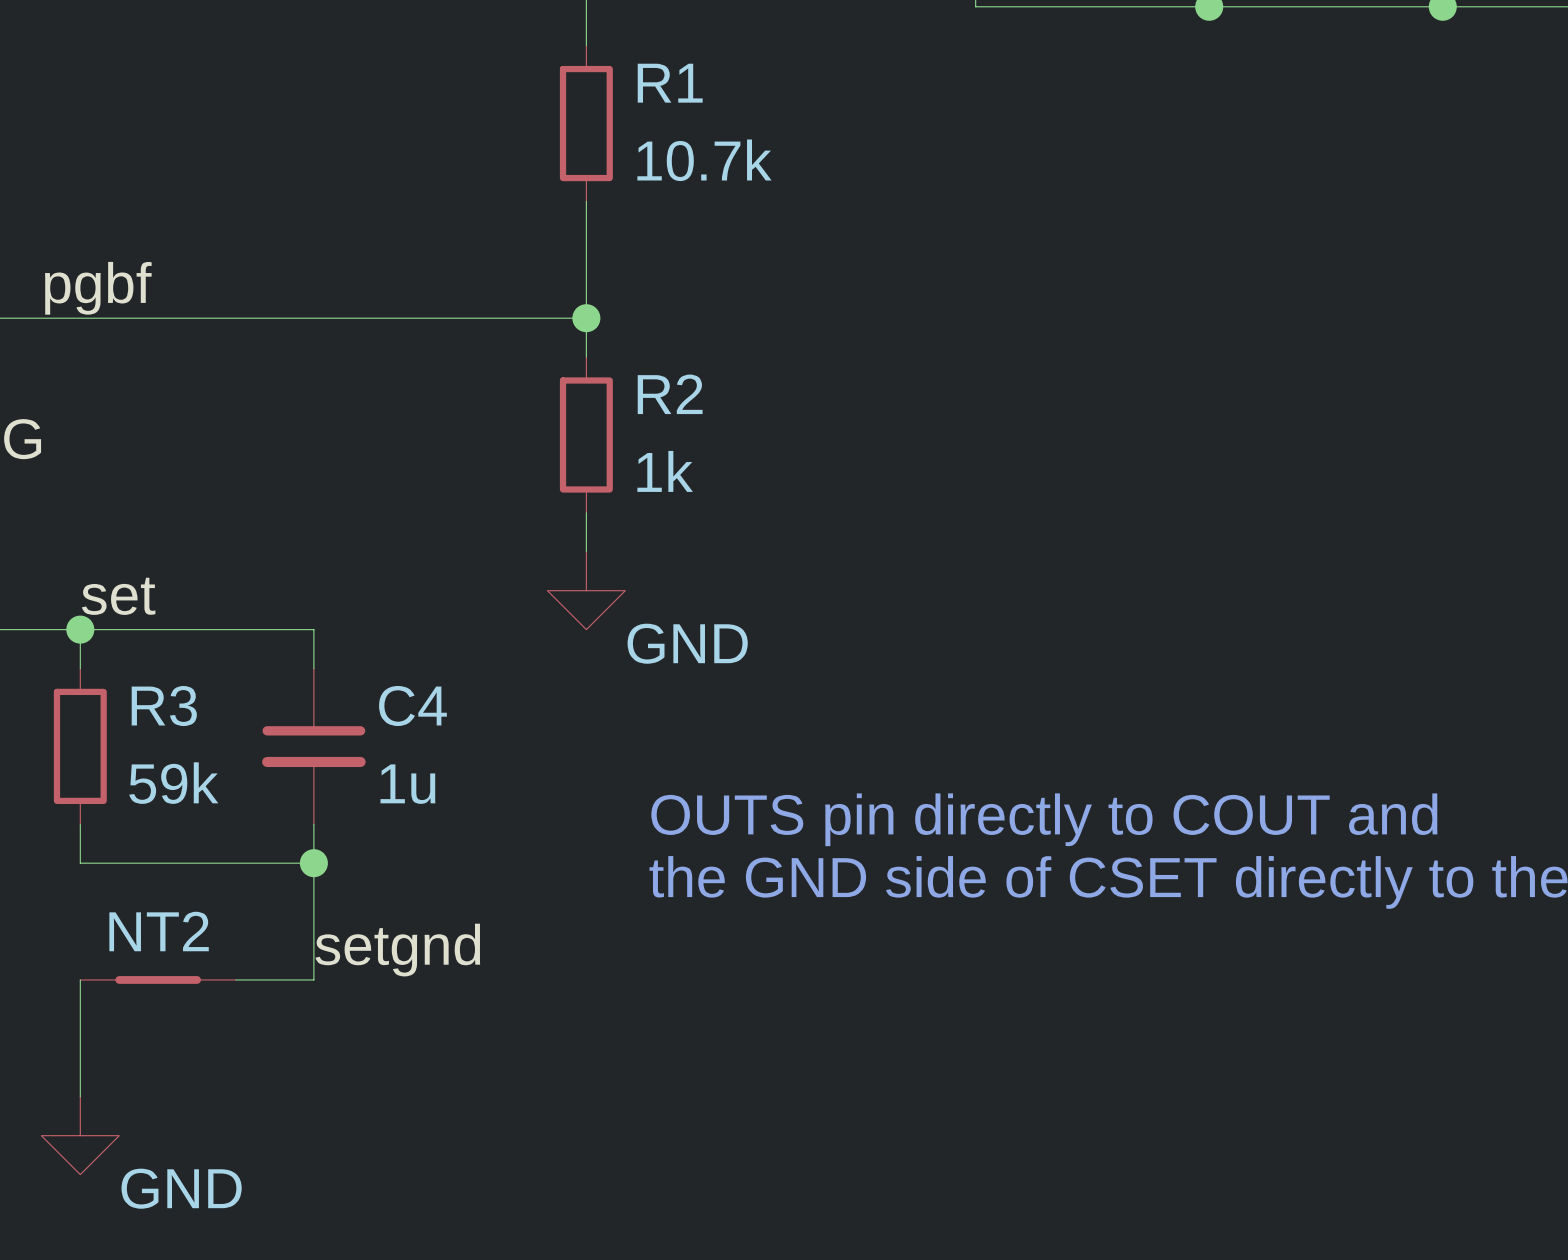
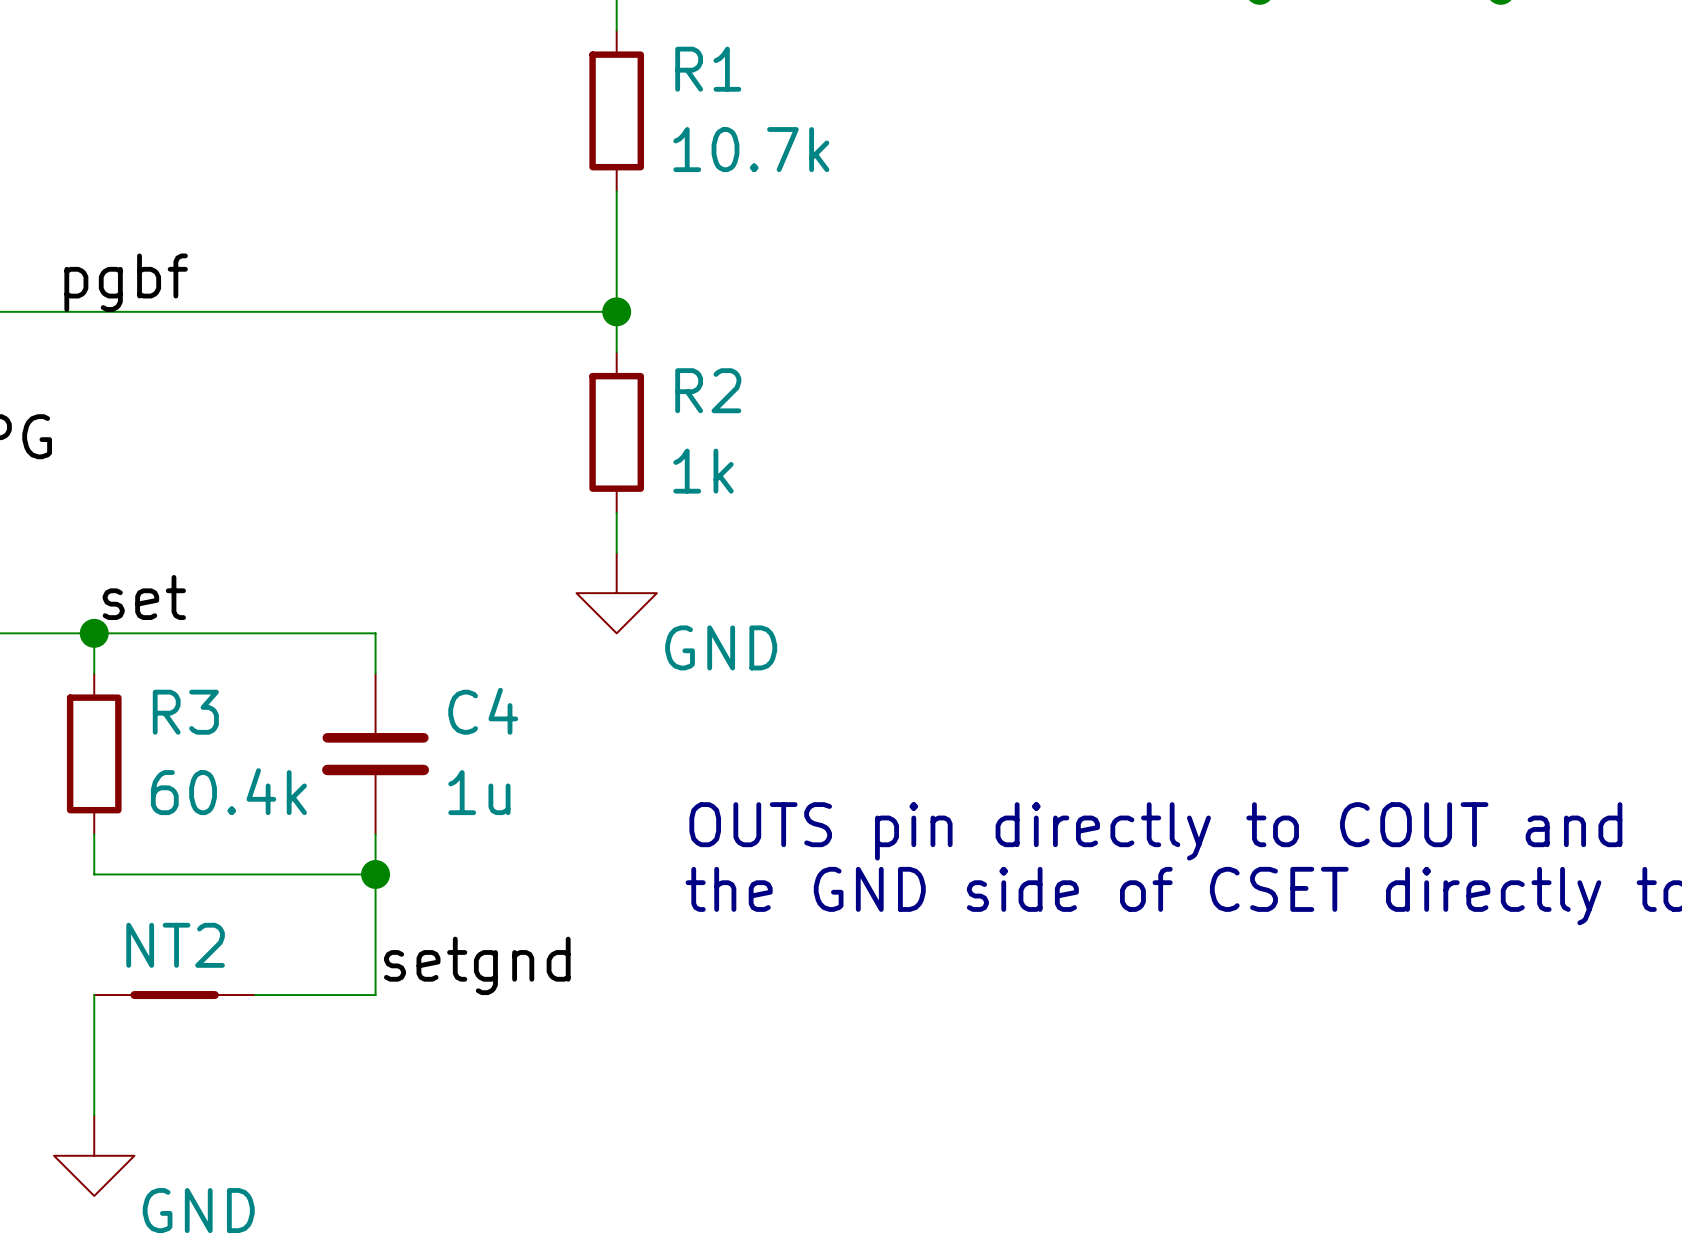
wire: (313, 629) (313, 668) -> (335, 633) (375, 633) (375, 673)
C4 position: (313, 746) -> (375, 753)
R3 value: 59k (173, 783) -> 60.4k (228, 791)
wire: (313, 824) (313, 979) -> (375, 834) (375, 995) (335, 995)
wire: none -> (335, 874) (375, 874)
junction position: (313, 863) -> (375, 874)
label position: setgnd (397, 950) -> setgnd (477, 965)

